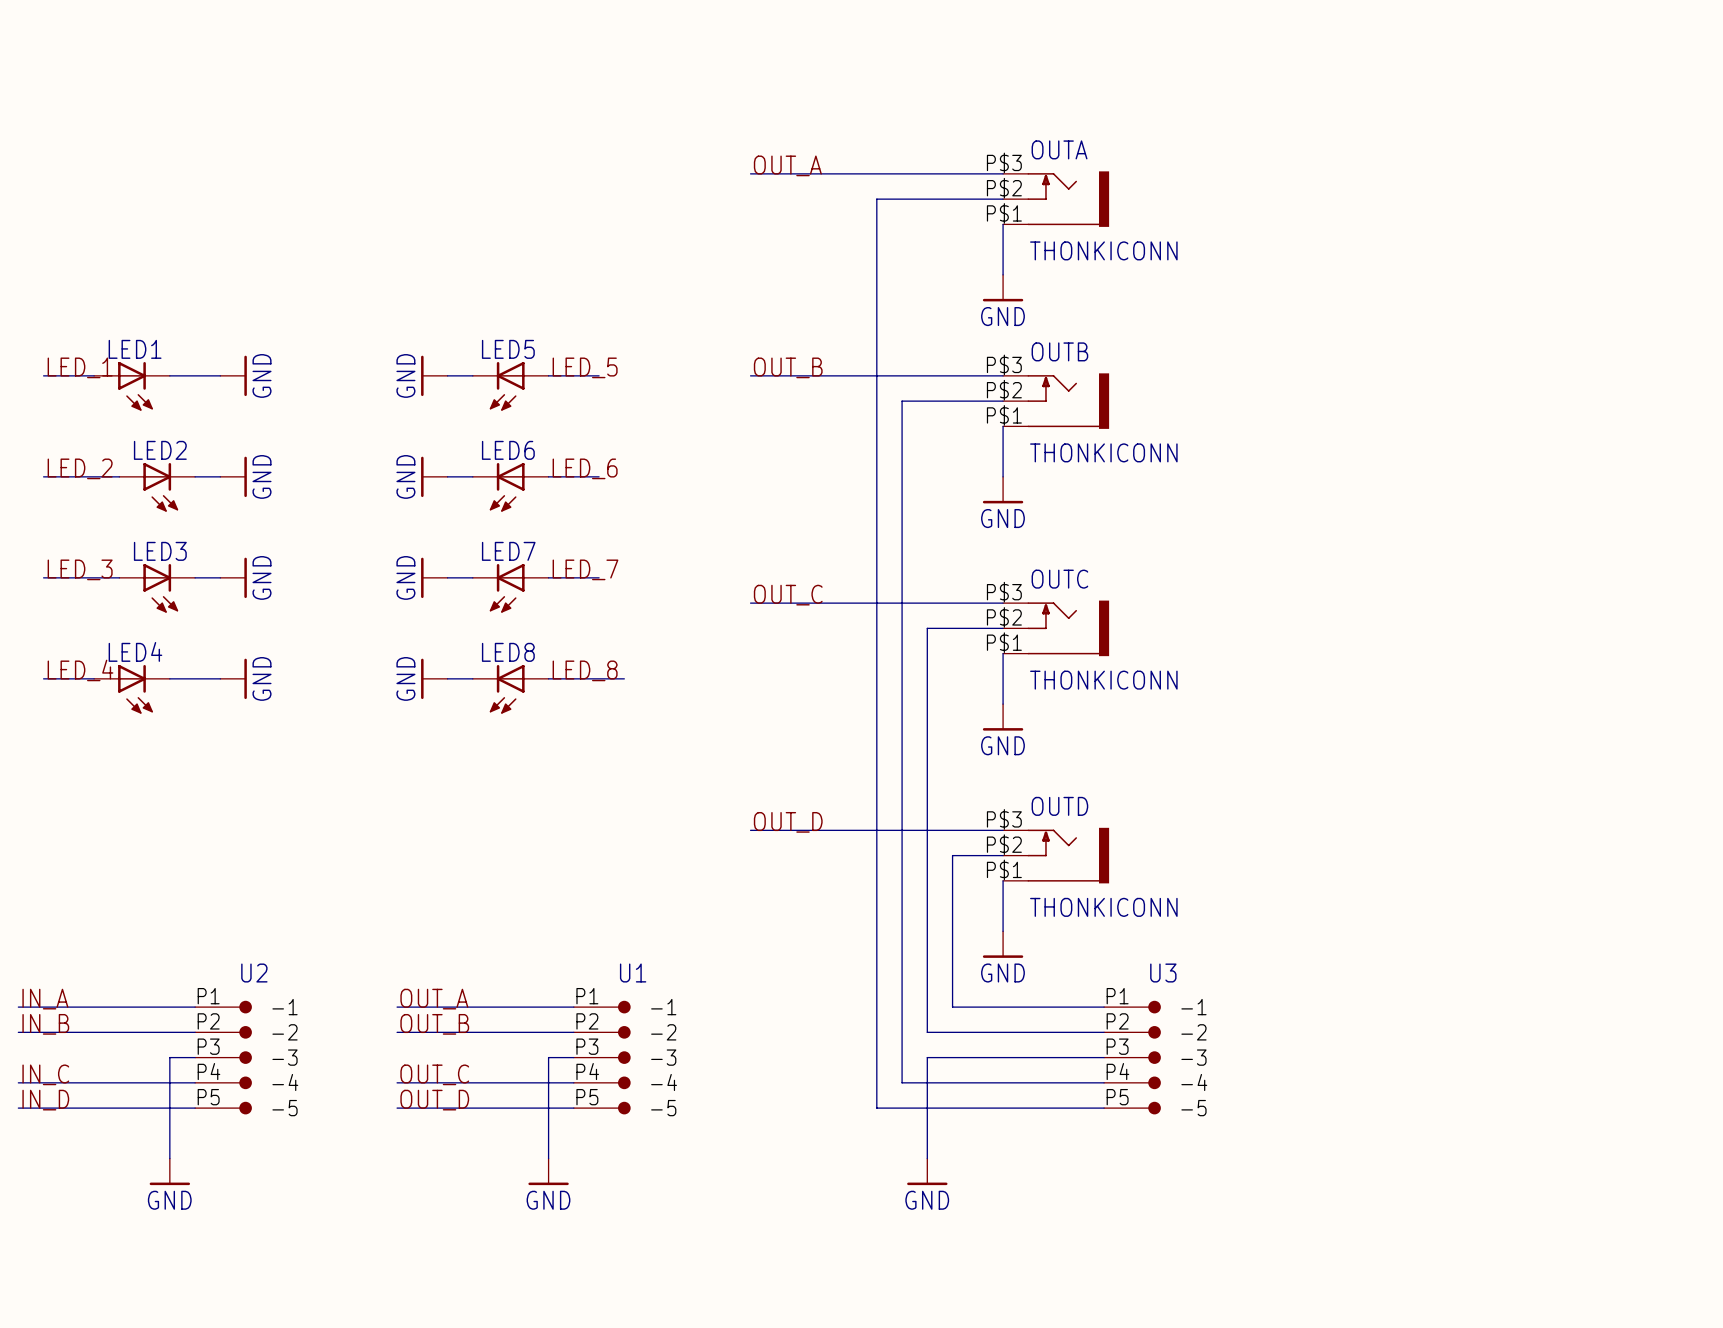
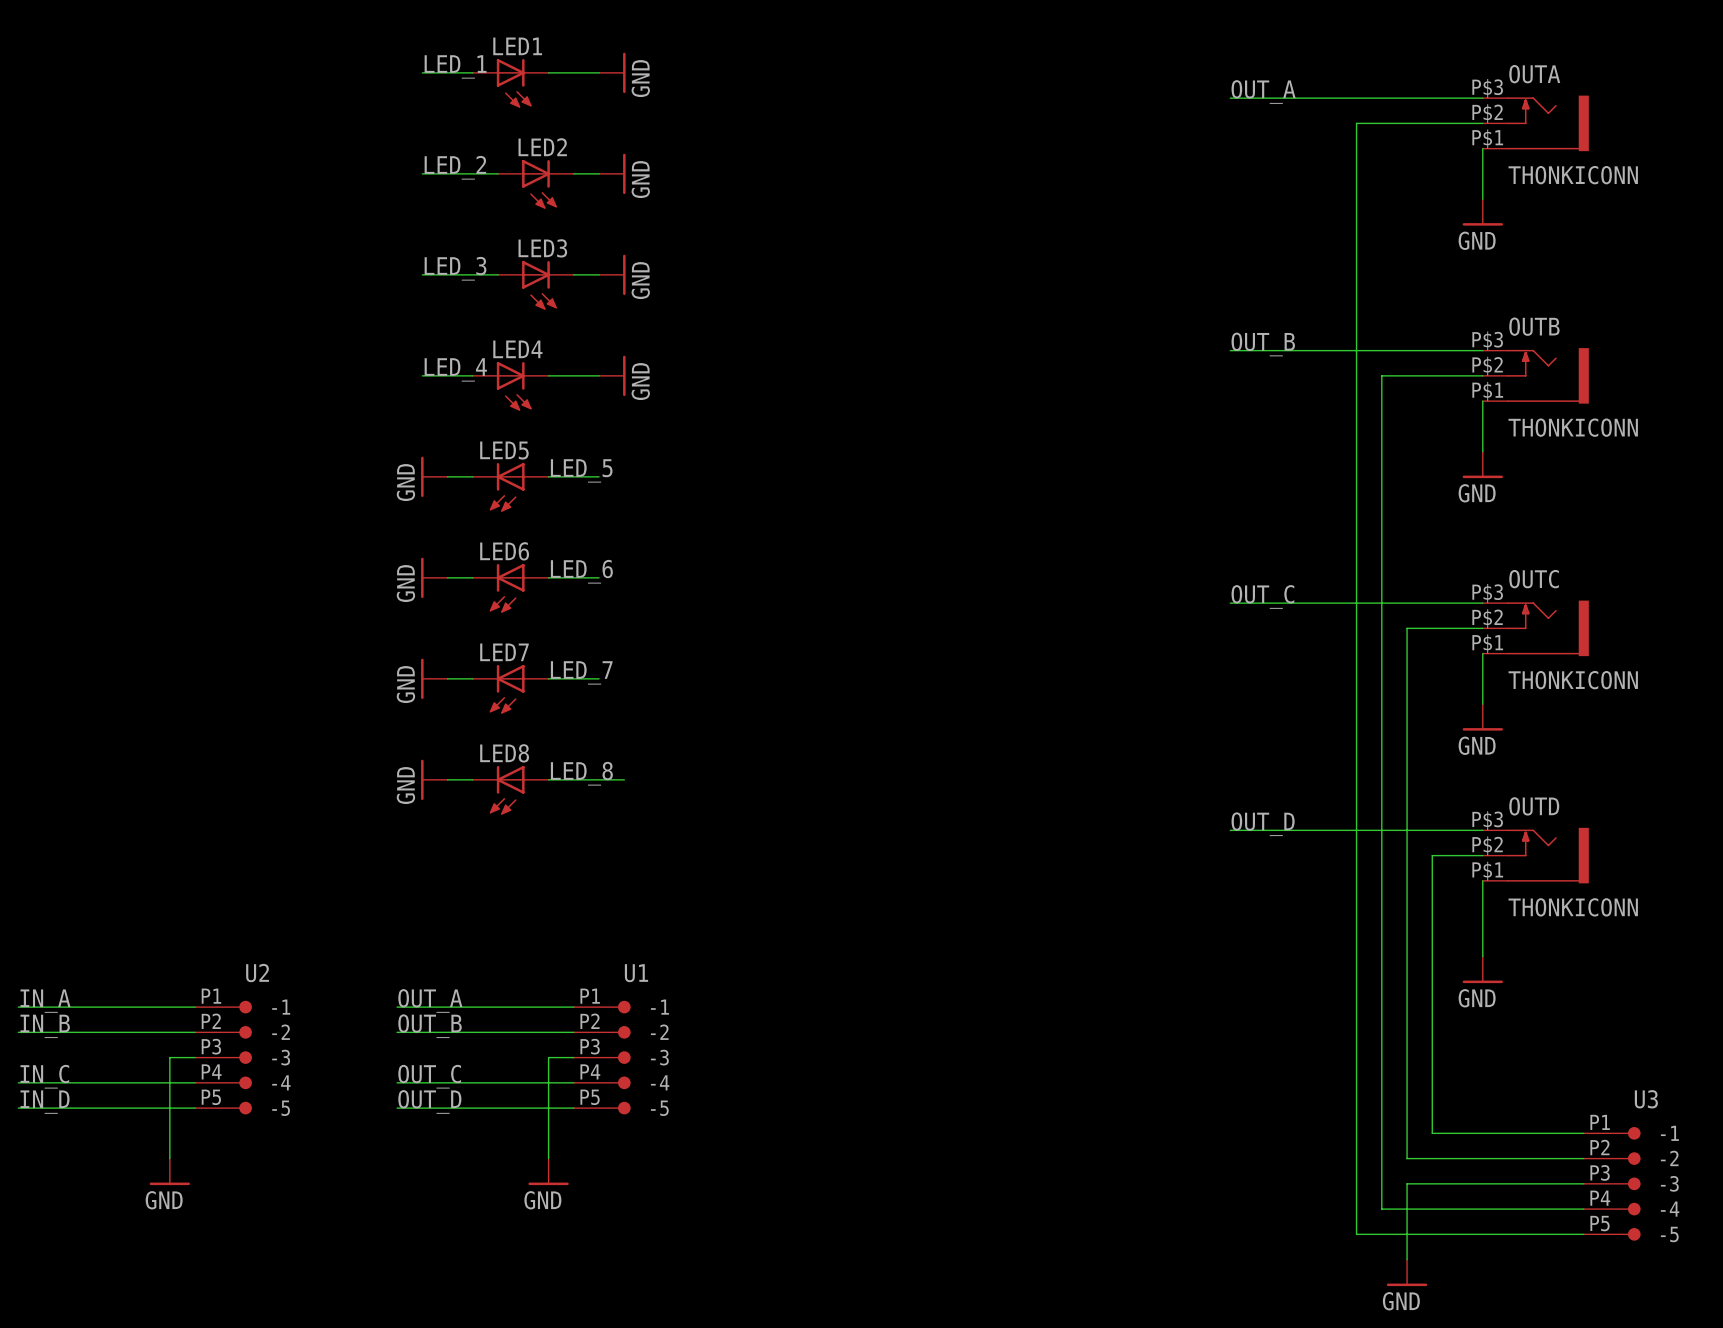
label: none -> LED_1 (455, 66)
wire: none -> (422, 72) (472, 72)
wire: none -> (548, 72) (599, 72)
power symbol: none -> GND (612, 72)
label: none -> OUT_A (1263, 92)
wire: none -> (1230, 98) (1482, 98)
wire: none -> (1482, 123) (1356, 123) (1356, 1234) (1583, 1234)
OUTA: none -> THONKICONN (1535, 123)
wire: none -> (1482, 148) (1482, 199)
label: none -> LED_2 (455, 167)
label: OUT_A (787, 165) -> none
wire: none -> (422, 173) (498, 173)
wire: none -> (573, 173) (599, 173)
power symbol: none -> GND (612, 173)
wire: (750, 173) (1003, 173) -> none
wire: (1003, 199) (876, 199) (876, 1108) (1104, 1108) -> none
OUTA: THONKICONN (1056, 199) -> none
power symbol: none -> GND (1482, 212)
wire: (1003, 224) (1003, 274) -> none
label: none -> LED_3 (455, 268)
wire: none -> (422, 274) (498, 274)
wire: none -> (573, 274) (599, 274)
power symbol: none -> GND (612, 274)
power symbol: GND (1003, 288) -> none
label: none -> OUT_B (1263, 344)
wire: none -> (1230, 350) (1482, 350)
label: LED_1 (80, 367) -> none
label: none -> LED_4 (455, 369)
label: LED_5 (585, 367) -> none
label: OUT_B (788, 367) -> none
wire: (43, 375) (94, 375) -> none
wire: (169, 375) (220, 375) -> none
power symbol: GND (233, 375) -> none
power symbol: GND (434, 375) -> none
power symbol: none -> GND (612, 375)
wire: (750, 375) (1003, 375) -> none
wire: none -> (1482, 375) (1381, 375) (1381, 1209) (1583, 1209)
OUTB: none -> THONKICONN (1535, 375)
LED1 position: (131, 386) -> (510, 83)
LED5: (510, 386) -> none
wire: (1003, 401) (902, 401) (902, 1082) (1104, 1082) -> none
OUTB: THONKICONN (1056, 401) -> none
wire: none -> (1482, 401) (1482, 451)
wire: (1003, 426) (1003, 476) -> none
LED6 name: LED6 (508, 450) -> LED5 (504, 450)
power symbol: none -> GND (1482, 464)
label: LED_2 (80, 468) -> none
label: LED_6 (585, 468) -> LED_5 (581, 470)
wire: (43, 476) (119, 476) -> none
wire: (195, 476) (220, 476) -> none
power symbol: GND (233, 476) -> none
LED2 position: (157, 487) -> (535, 184)
power symbol: GND (1003, 490) -> none
LED7 name: LED7 (508, 551) -> LED6 (504, 551)
label: LED_3 (80, 569) -> none
label: LED_7 (585, 569) -> LED_6 (581, 571)
wire: (43, 577) (119, 577) -> none
wire: (195, 577) (220, 577) -> none
power symbol: GND (233, 577) -> none
LED3 position: (157, 588) -> (535, 285)
label: OUT_C (788, 595) -> none
label: none -> OUT_C (1262, 596)
wire: (750, 603) (1003, 603) -> none
wire: none -> (1230, 603) (1482, 603)
wire: (1003, 628) (927, 628) (927, 1032) (1104, 1032) -> none
OUTC: THONKICONN (1056, 628) -> none
wire: none -> (1482, 628) (1407, 628) (1407, 1158) (1583, 1158)
OUTC: none -> THONKICONN (1535, 628)
LED8 name: LED8 (508, 652) -> LED7 (504, 652)
wire: (1003, 653) (1003, 704) -> none
wire: none -> (1482, 653) (1482, 704)
label: LED_4 (80, 670) -> none
label: LED_8 (585, 670) -> LED_7 (581, 672)
wire: (43, 678) (94, 678) -> none
wire: (169, 678) (220, 678) -> none
power symbol: GND (233, 678) -> none
wire: (599, 678) (624, 678) -> (447, 779) (472, 779)
LED4 position: (131, 689) -> (510, 386)
power symbol: GND (1003, 717) -> none
power symbol: none -> GND (1482, 717)
label: none -> LED_8 (581, 773)
power symbol: none -> GND (434, 779)
wire: none -> (548, 779) (624, 779)
LED8: none -> (510, 790)
label: OUT_D (788, 822) -> none
label: none -> OUT_D (1263, 824)
wire: (750, 830) (1003, 830) -> none
wire: none -> (1230, 830) (1482, 830)
wire: (1003, 855) (952, 855) (952, 1007) (1104, 1007) -> none
OUTD: THONKICONN (1056, 855) -> none
wire: none -> (1482, 855) (1432, 855) (1432, 1133) (1583, 1133)
OUTD: none -> THONKICONN (1535, 855)
wire: (1003, 880) (1003, 931) -> none
wire: none -> (1482, 880) (1482, 956)
power symbol: GND (1003, 944) -> none
power symbol: none -> GND (1482, 969)
wire: (1104, 1057) (927, 1057) (927, 1158) -> none
U3 position: (1132, 1057) -> (1612, 1183)
power symbol: GND (927, 1171) -> none
wire: none -> (1583, 1183) (1407, 1183) (1407, 1259)
power symbol: none -> GND (1407, 1272)

